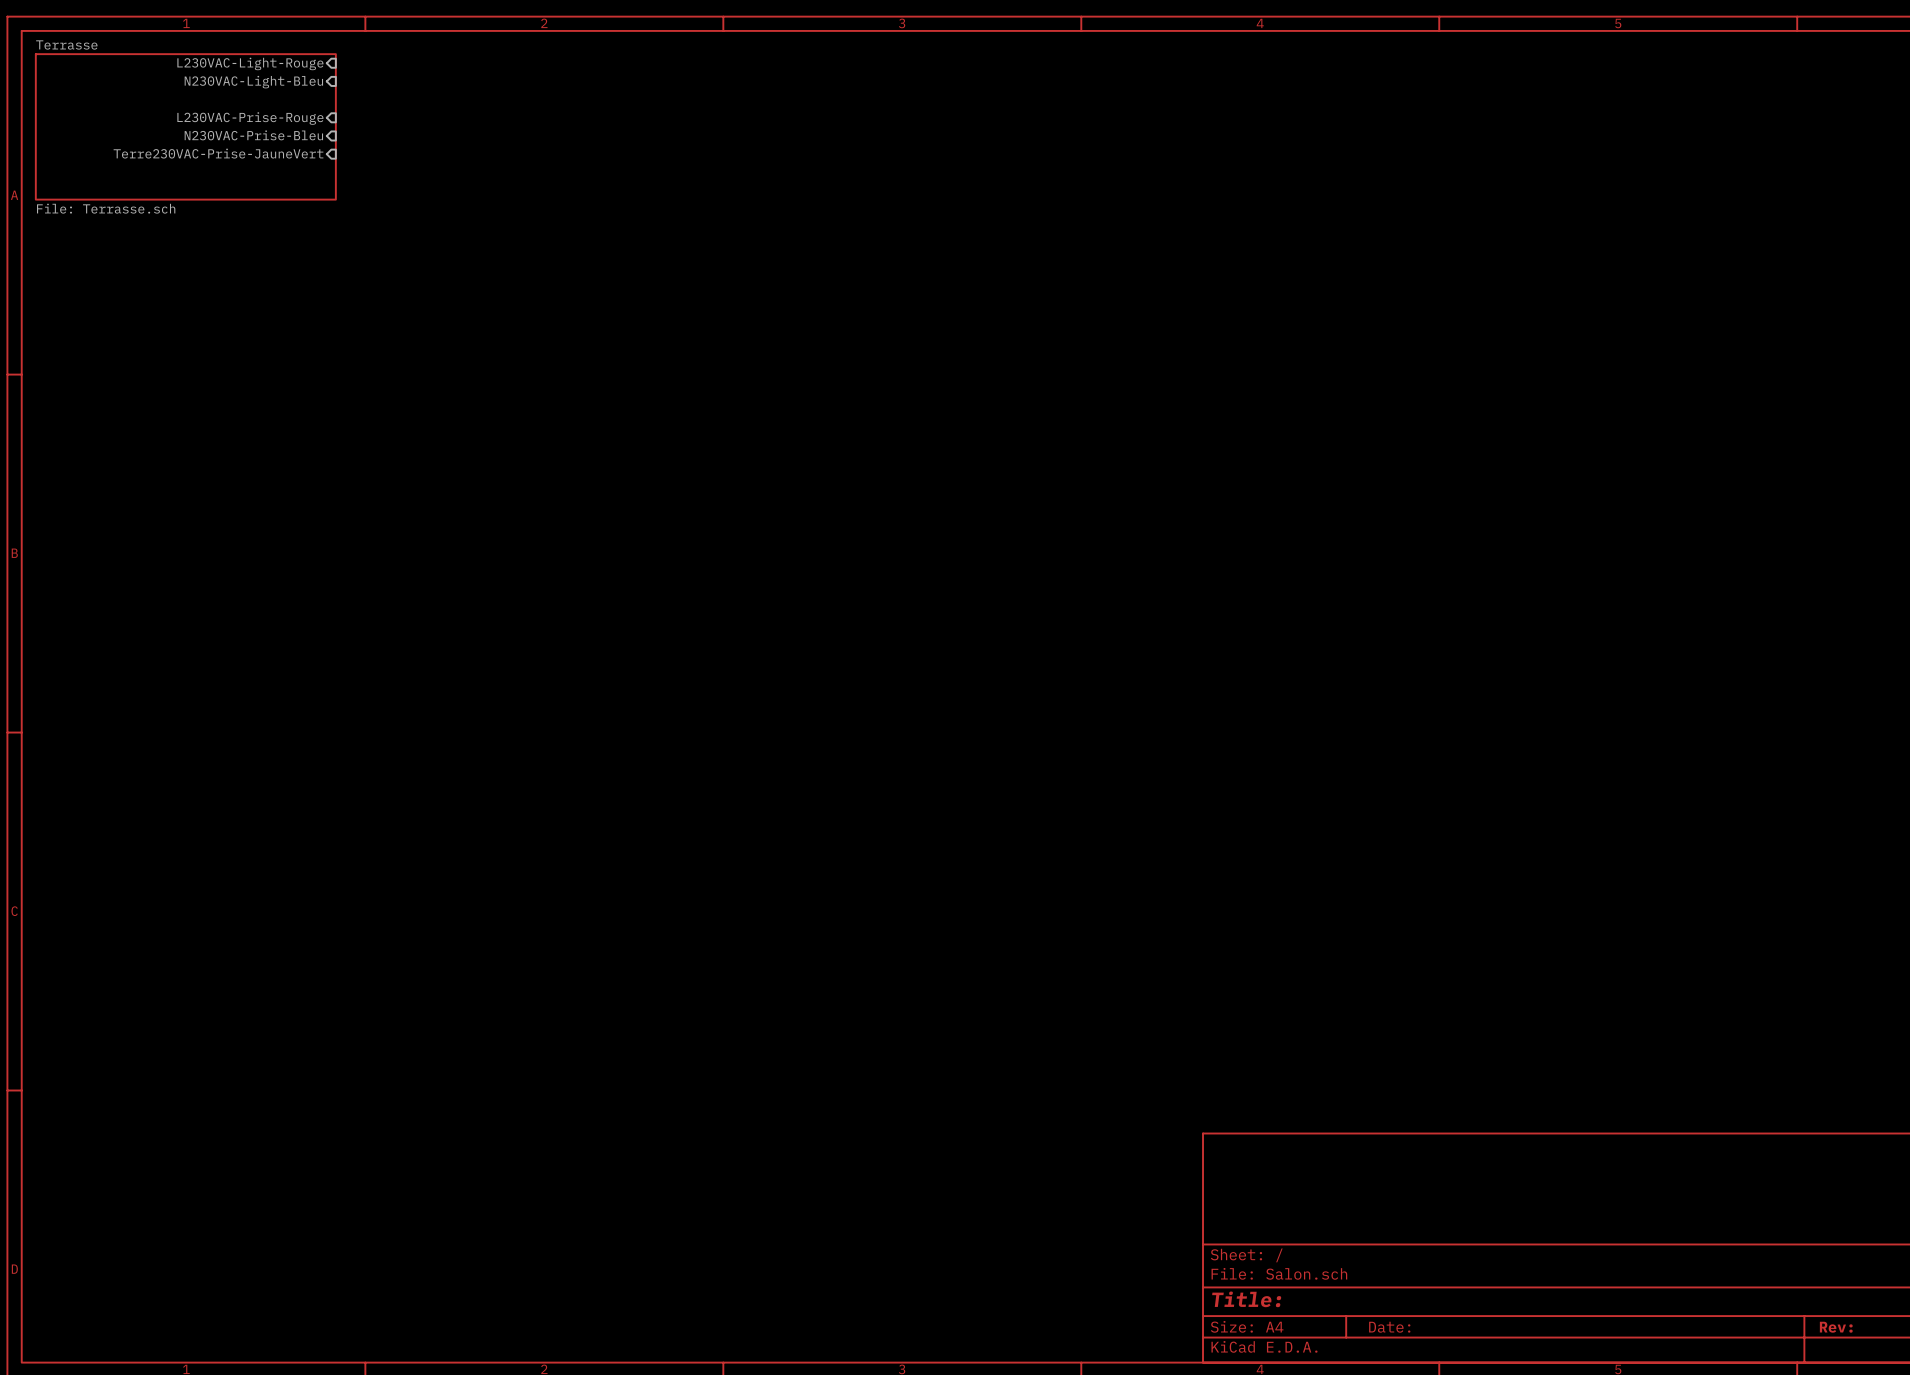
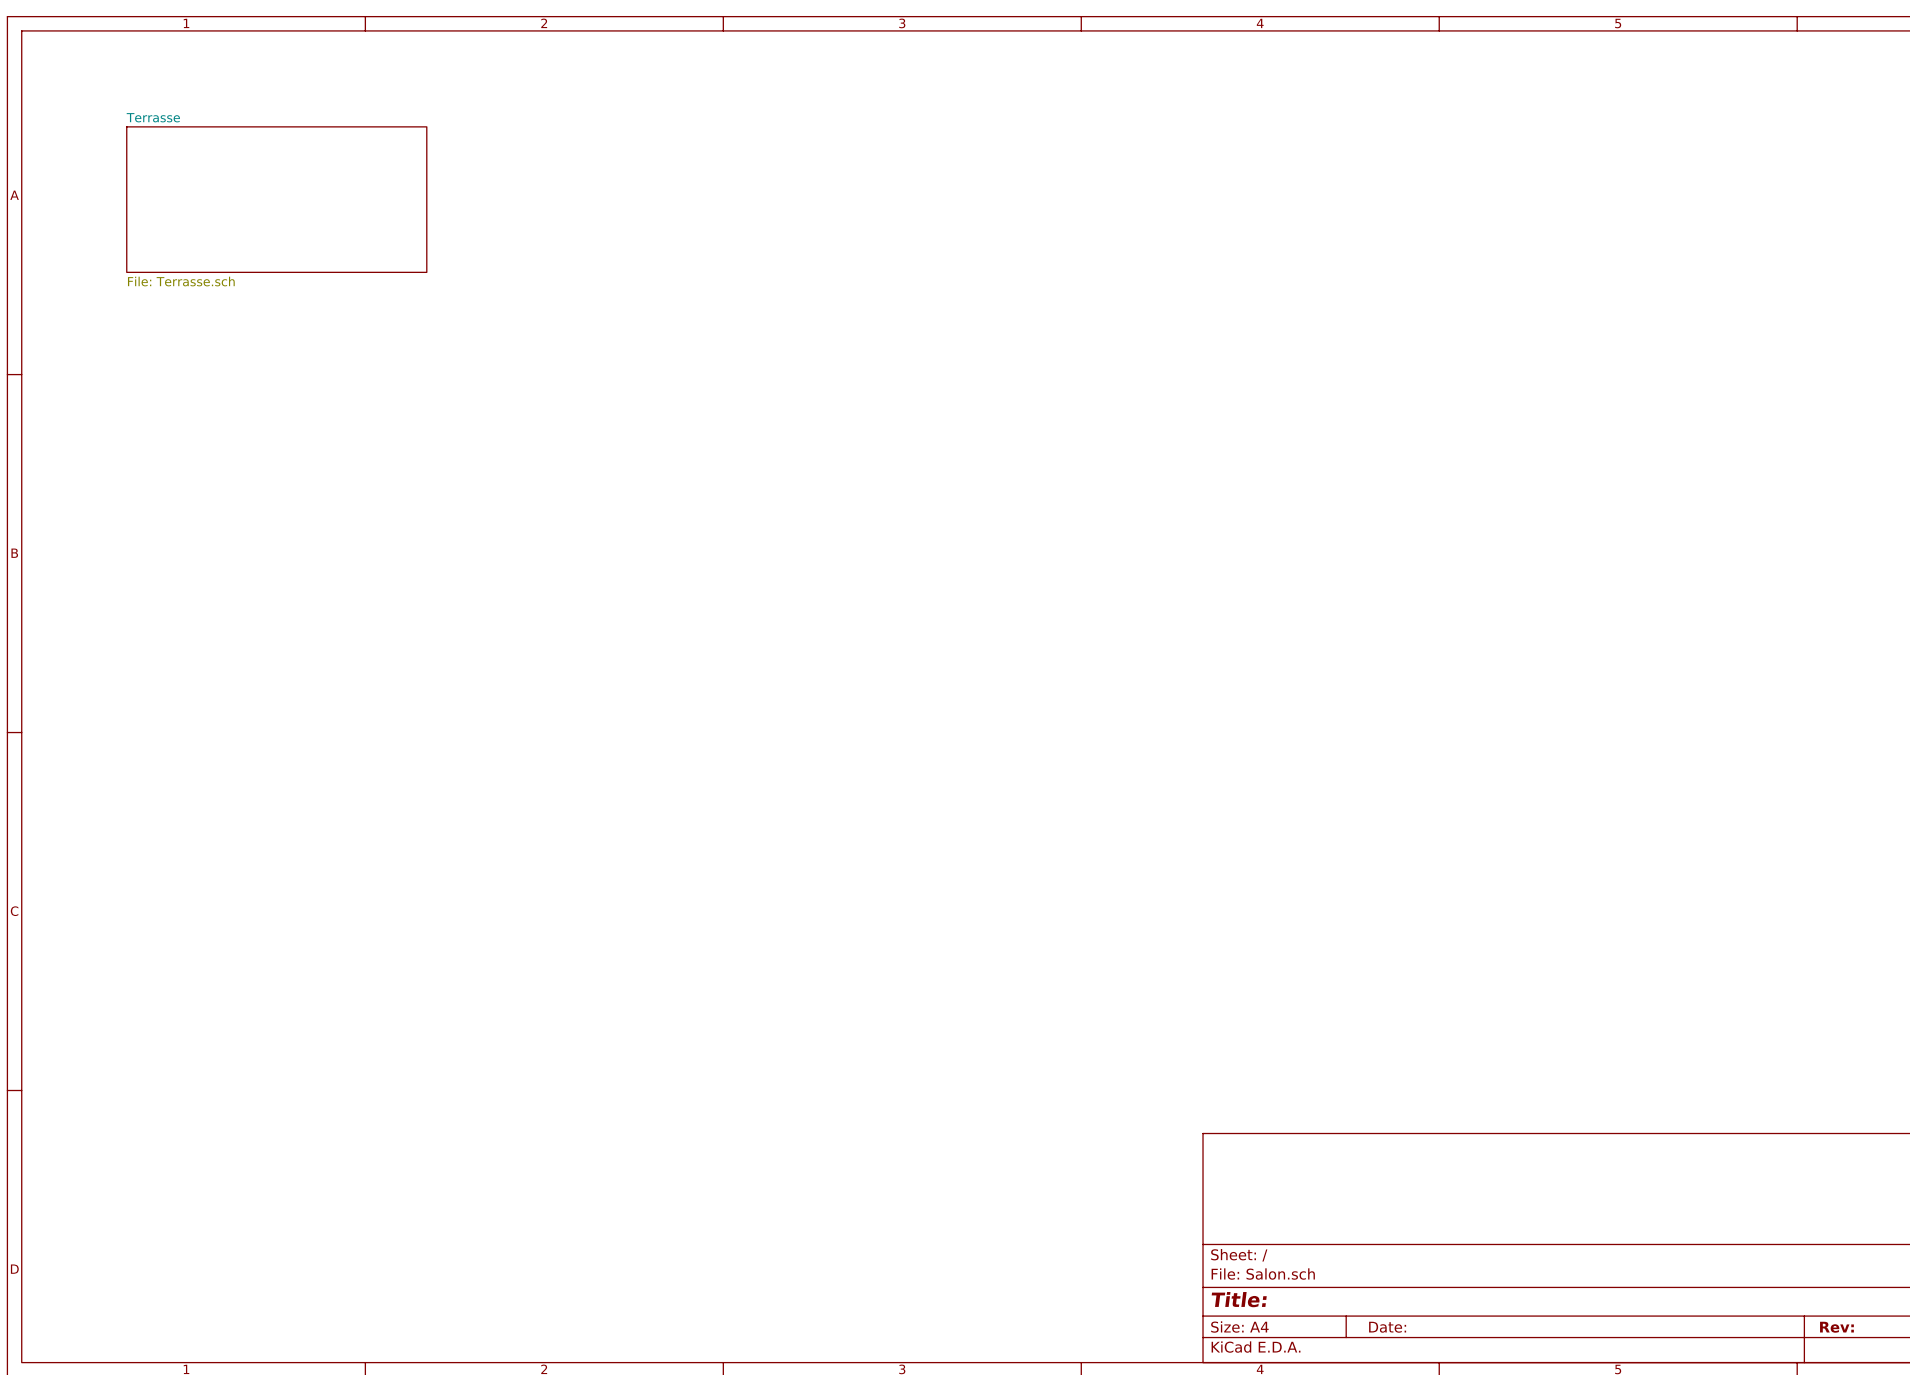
sheet pin: L230VAC-Light-Rouge (250, 63) -> none
sheet pin: N230VAC-Light-Bleu (253, 82) -> none
sheet pin: L230VAC-Prise-Rouge (250, 118) -> none
sheet Terrasse position: (185, 126) -> (276, 199)
sheet pin: N230VAC-Prise-Bleu (253, 135) -> none
sheet pin: Terre230VAC-Prise-JauneVert (218, 153) -> none

